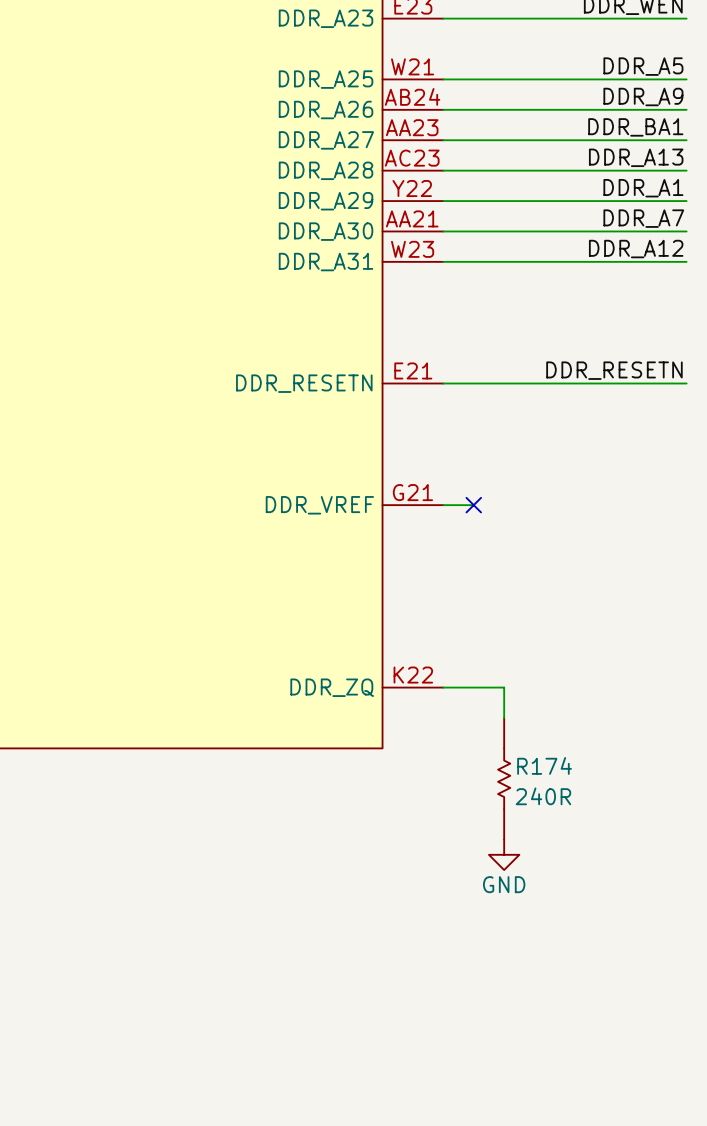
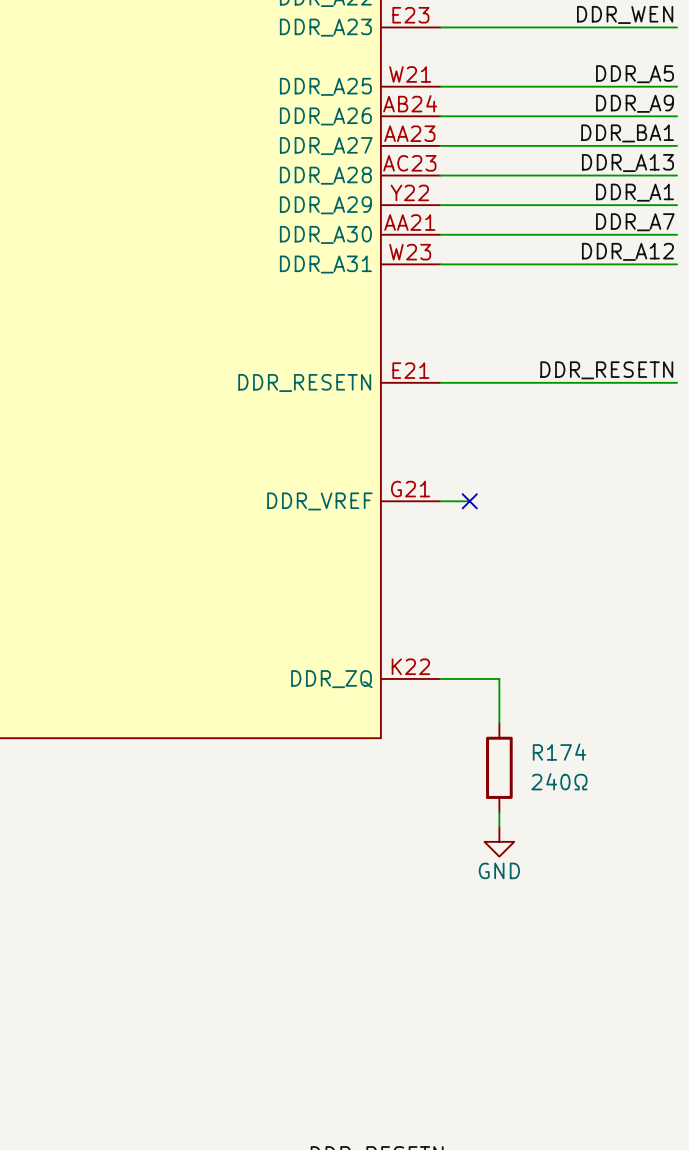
R174 symbol: [498, 717, 511, 840] -> [486, 723, 513, 813]
R174 text: none -> 240Ω (559, 781)
R174 text: 240R (543, 796) -> none

